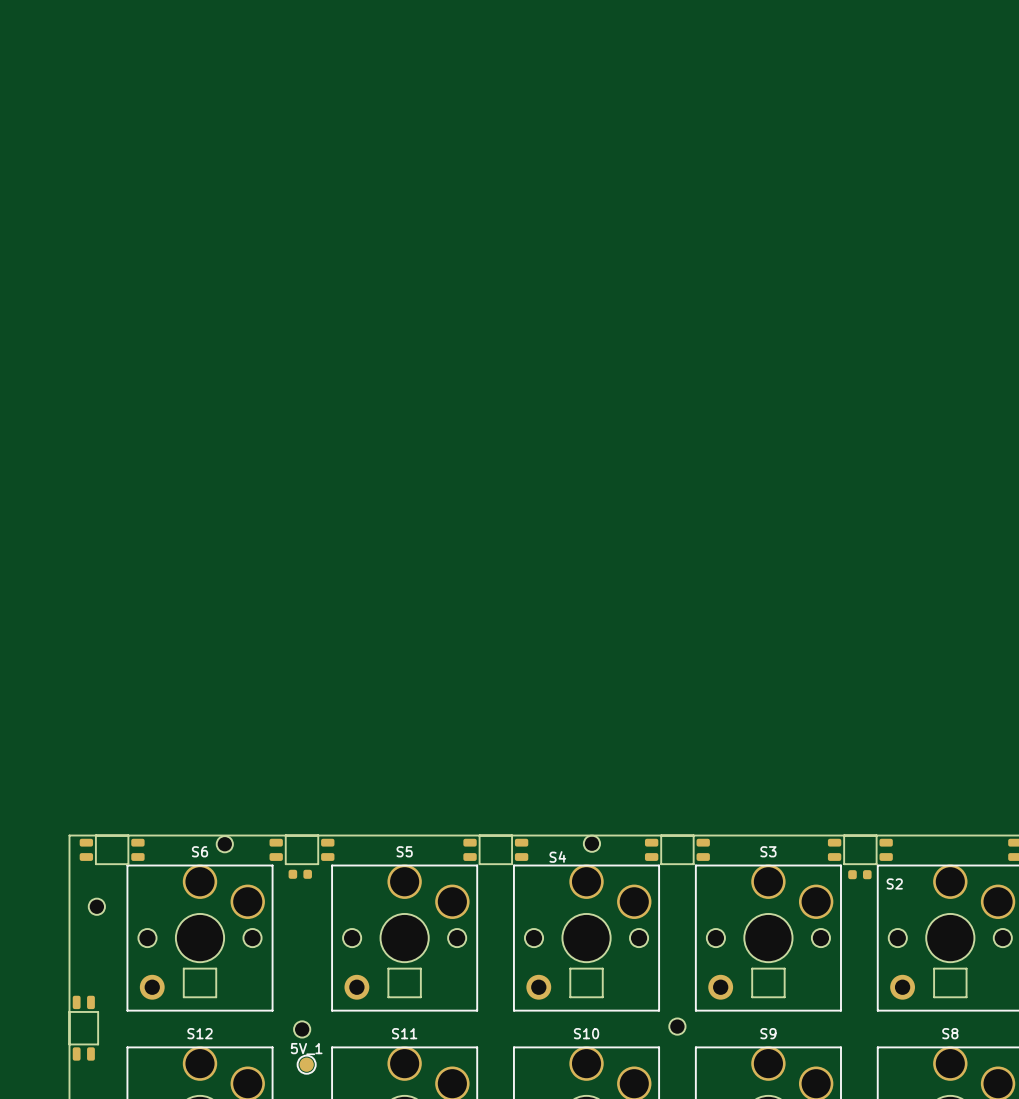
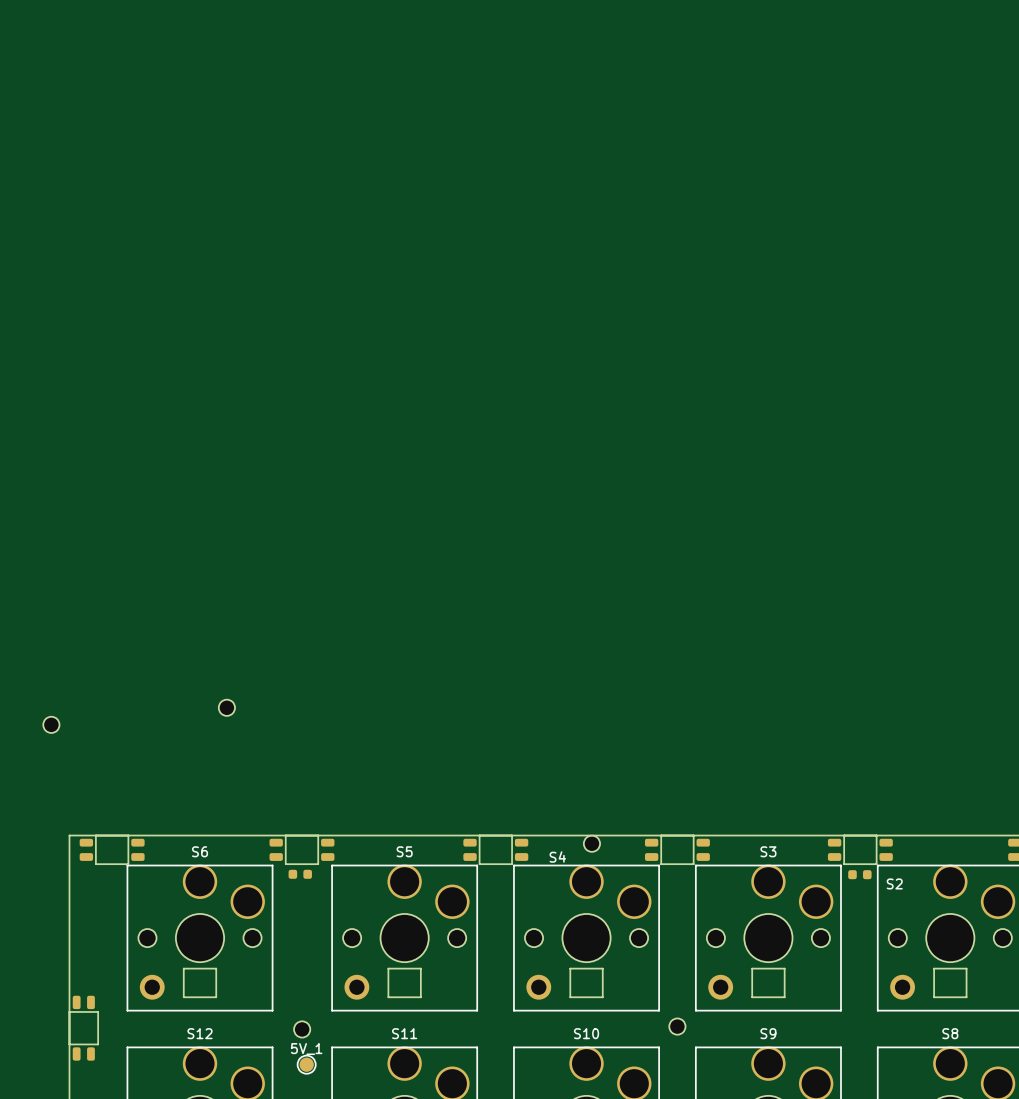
part: none -> (226, 707)
part: none -> (51, 724)
part: (224, 844) -> none
part: (96, 906) -> none

